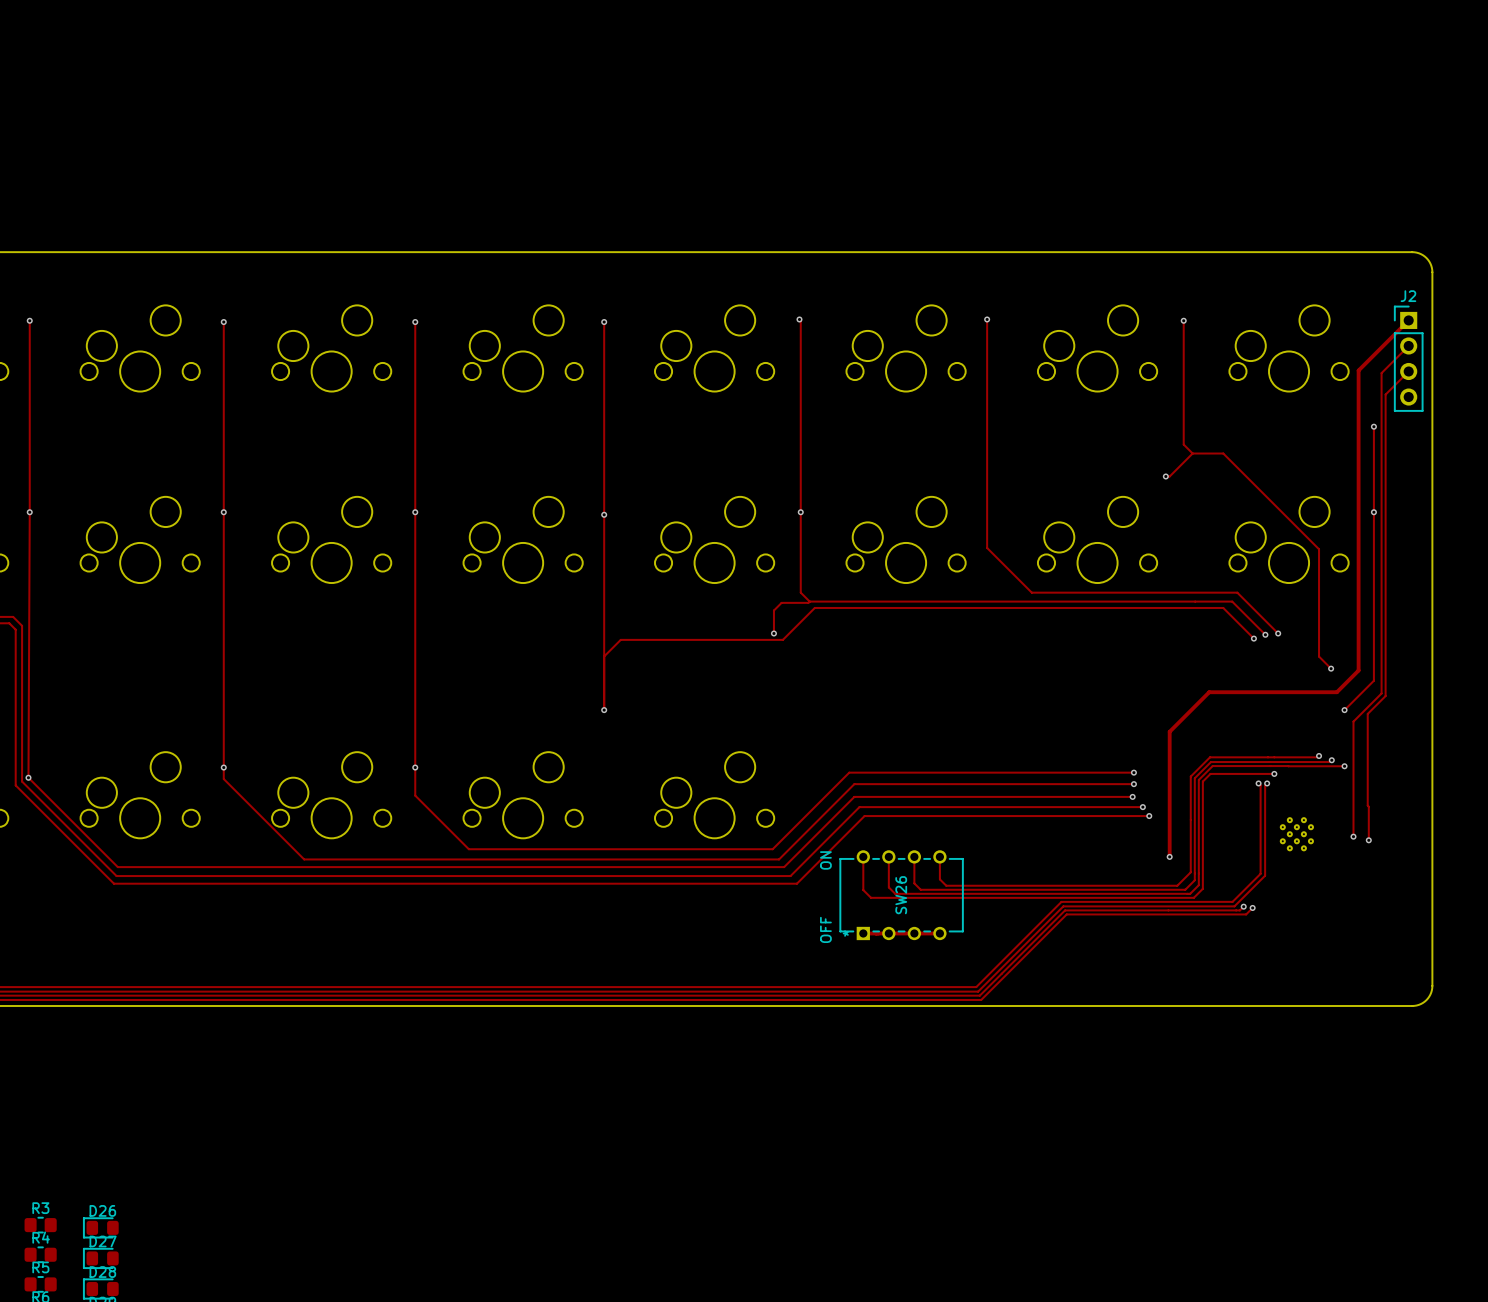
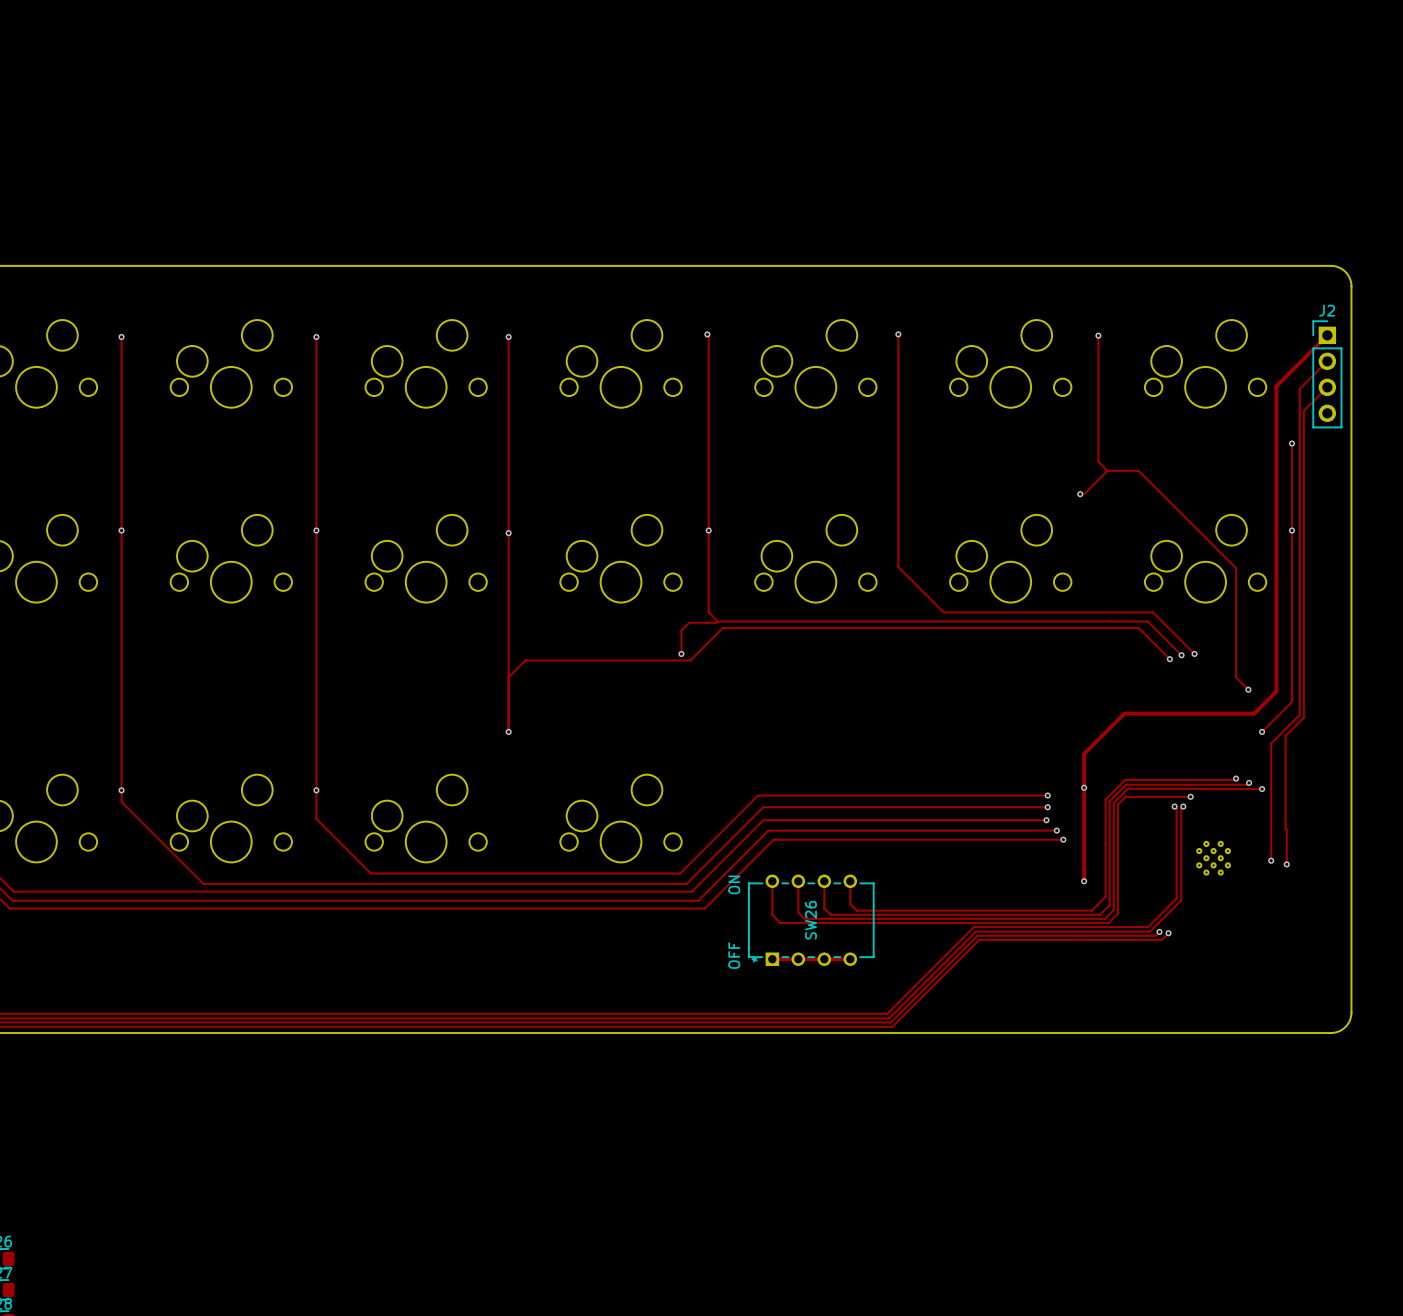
via: none -> (1084, 787)

